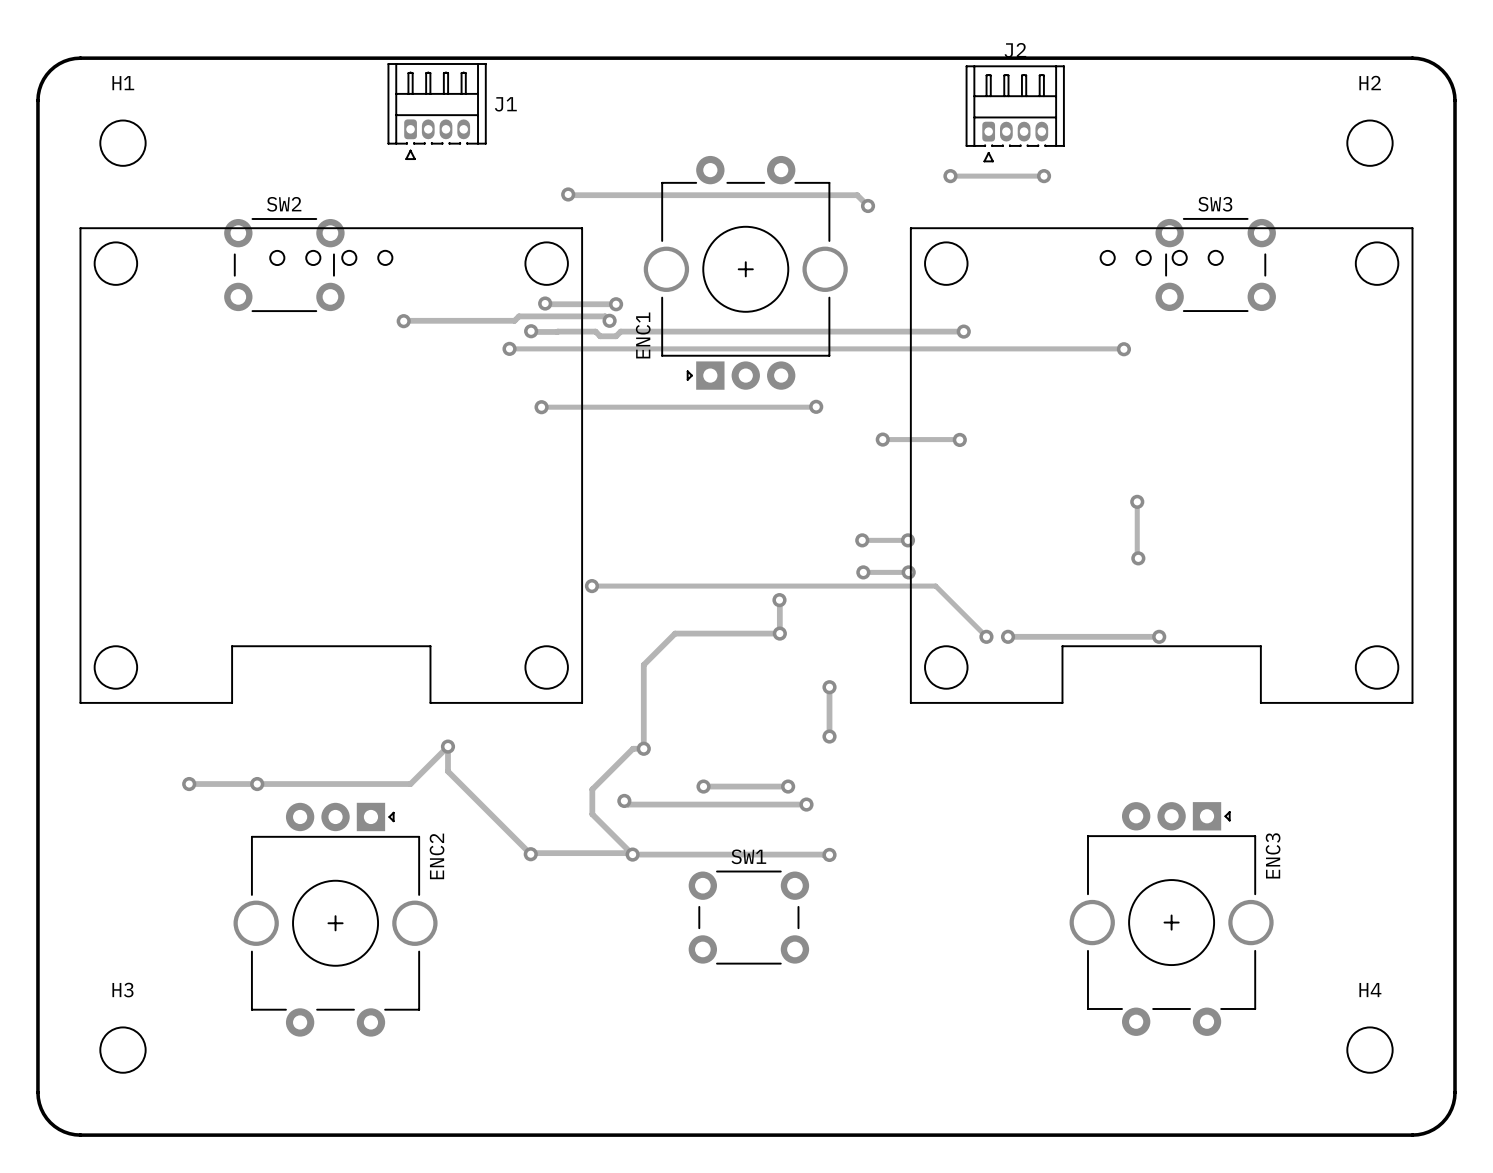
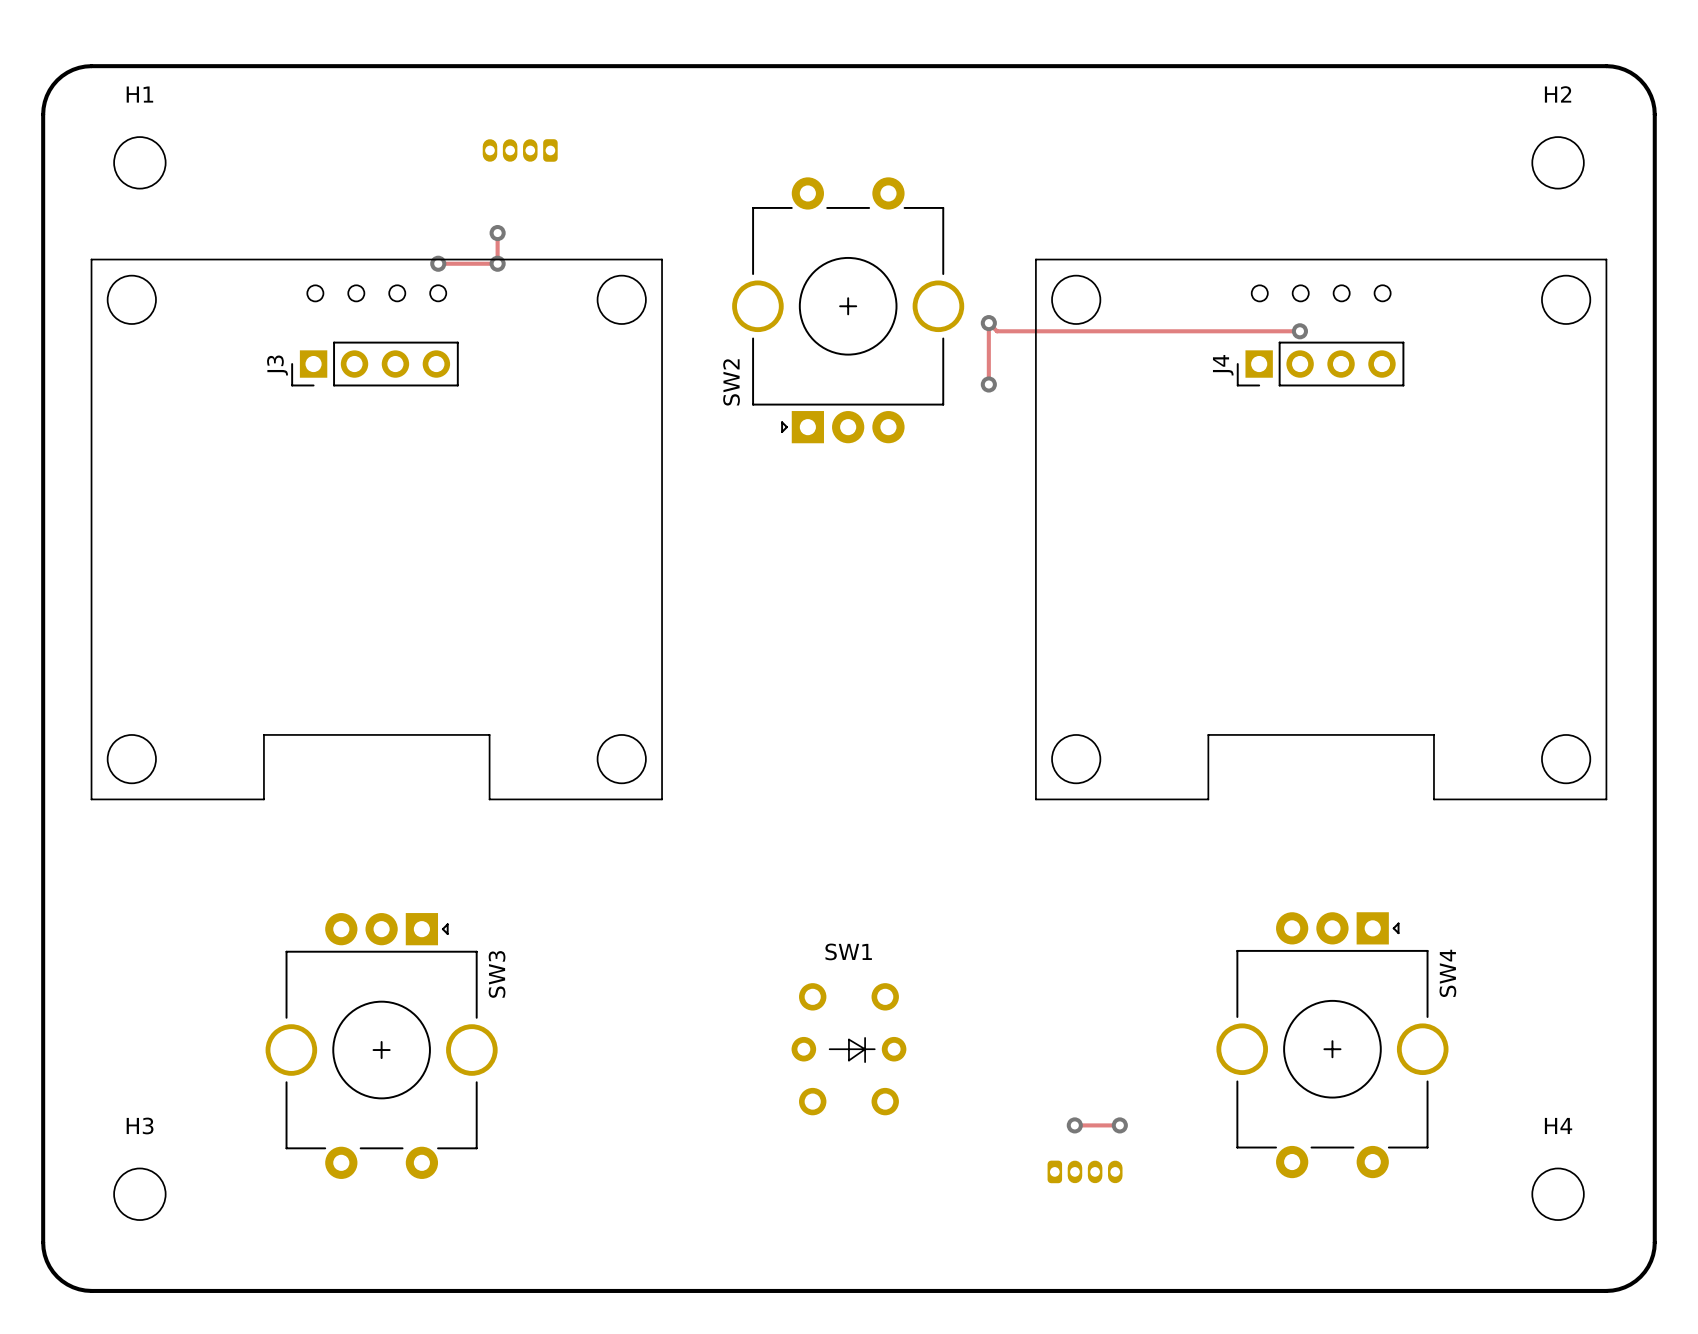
J1 side: top (437, 111) -> bottom (520, 150)
J2: (1015, 113) -> none
track: (950, 176) (1044, 176) -> none
via: (950, 176) -> none
via: (1044, 176) -> none
track: (568, 194) (857, 195) (868, 205) -> none
via: (568, 194) -> none
track: none -> (497, 233) (497, 263) (438, 263)
via: none -> (497, 233)
via: (868, 205) -> none
via: none -> (438, 263)
via: none -> (497, 263)
SW3: (1215, 264) -> none
SW2: (284, 265) -> none
via: none -> (988, 323)
track: none -> (1299, 331) (997, 331) (988, 323) (988, 384)
track: (545, 303) (616, 304) -> none
via: (545, 303) -> none
via: (616, 304) -> none
J3: none -> (374, 364)
track: (609, 320) (605, 316) (519, 316) (514, 320) (403, 321) -> none
via: (609, 320) -> none
J4: none -> (1320, 364)
via: (403, 321) -> none
track: (531, 331) (595, 331) (600, 336) (616, 336) (620, 331) (963, 331) -> none
via: (531, 331) -> none
via: (963, 331) -> none
ENC1 name: ENC1 (643, 335) -> SW2 (731, 382)
via: none -> (988, 384)
track: (509, 348) (1123, 349) -> none
via: (509, 348) -> none
via position: (1123, 349) -> (1299, 331)
track: (816, 406) (541, 407) -> none
via: (816, 406) -> none
via: (541, 407) -> none
track: (882, 439) (959, 439) -> none
via: (882, 439) -> none
via: (959, 439) -> none
track: (1137, 501) (1138, 558) -> none
via: (1137, 501) -> none
track: (862, 540) (907, 540) -> none
via: (862, 540) -> none
via: (907, 540) -> none
via: (1138, 558) -> none
track: (863, 572) (908, 572) -> none
via: (863, 572) -> none
via: (908, 572) -> none
track: (591, 586) (935, 586) (986, 636) -> none
via: (591, 586) -> none
track: (779, 600) (779, 633) (675, 633) (643, 664) (643, 748) (632, 748) (592, 789) (592, 814) (632, 854) (829, 854) -> none
via: (779, 600) -> none
via: (779, 633) -> none
via: (986, 636) -> none
track: (1008, 636) (1159, 636) -> none
via: (1008, 636) -> none
via: (1159, 636) -> none
track: (829, 687) (829, 736) -> none
via: (829, 687) -> none
via: (829, 736) -> none
via: (447, 746) -> none
via: (643, 748) -> none
track: (189, 784) (410, 784) (447, 746) (447, 771) (530, 854) (631, 853) -> none
via: (189, 784) -> none
via: (257, 784) -> none
track: (703, 786) (788, 786) -> none
via: (703, 786) -> none
via: (788, 786) -> none
track: (624, 800) (627, 804) (806, 804) -> none
via: (624, 800) -> none
via: (806, 804) -> none
via: (530, 854) -> none
via: (632, 854) -> none
via: (829, 854) -> none
ENC3 name: ENC3 (1273, 855) -> SW4 (1447, 973)
ENC2 name: ENC2 (437, 856) -> SW3 (497, 974)
SW1 footprint: [688, 870, 810, 965] -> [791, 983, 907, 1116]
track: none -> (1074, 1125) (1119, 1125)
via: none -> (1074, 1125)
via: none -> (1119, 1125)
part: none -> (1085, 1171)

